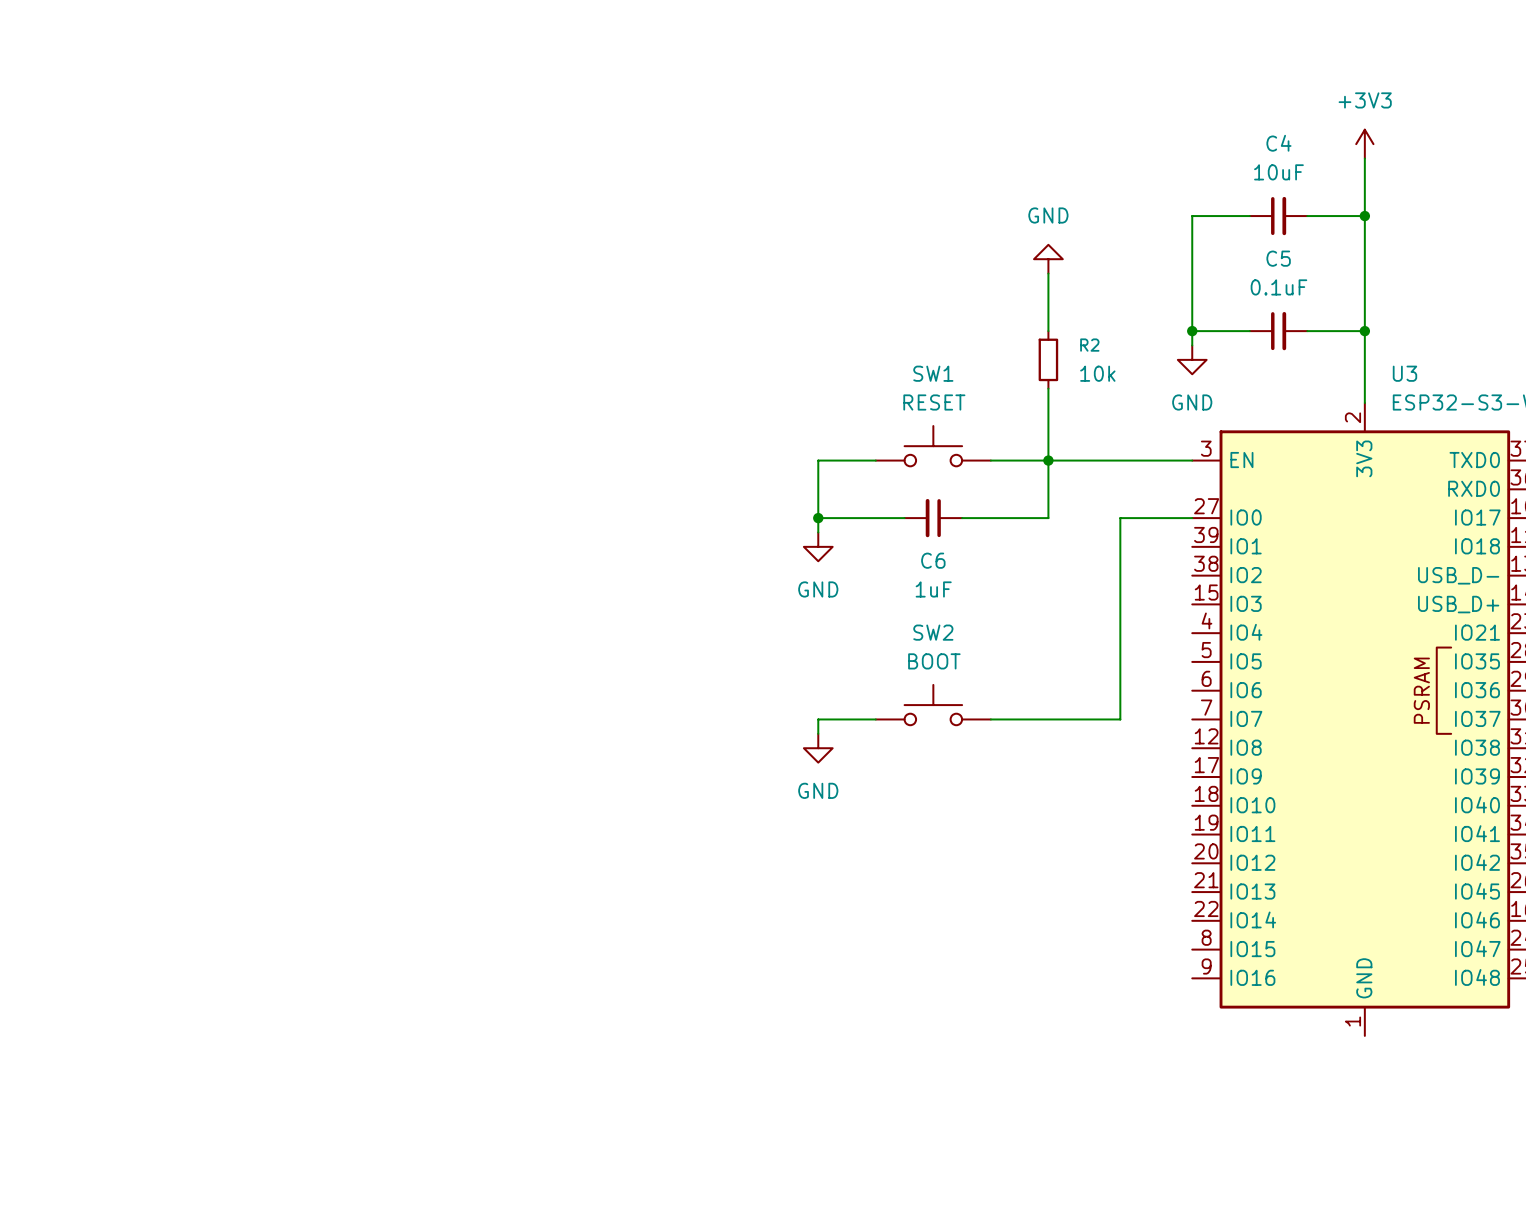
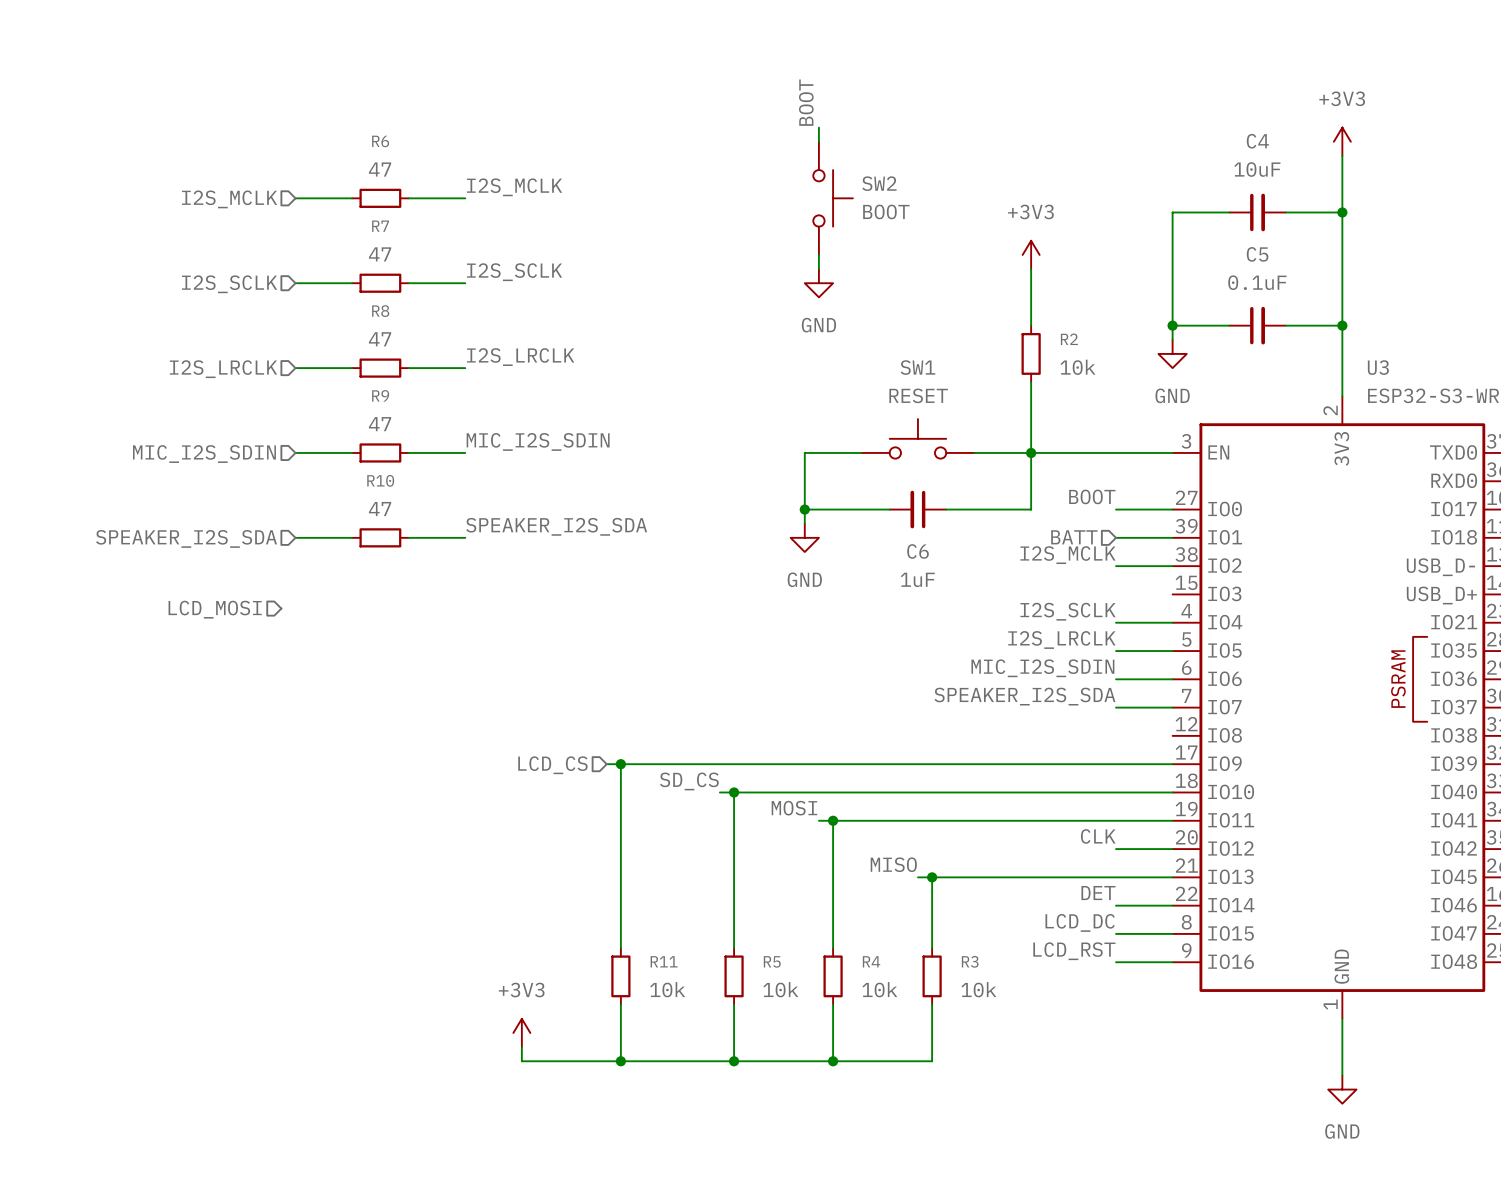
label: none -> BOOT (806, 102)
wire: none -> (818, 127) (818, 141)
label: none -> I2S_MCLK (514, 187)
hierarchical label: none -> I2S_MCLK (229, 199)
wire: none -> (295, 198) (352, 198)
R6: none -> 47 (380, 198)
wire: none -> (408, 198) (465, 198)
wire: none -> (818, 254) (818, 269)
power symbol: GND (1048, 259) -> +3V3 (1031, 254)
label: none -> I2S_SCLK (514, 272)
wire: none -> (295, 283) (352, 283)
R7: none -> 47 (380, 283)
wire: none -> (408, 283) (465, 283)
power symbol: none -> GND (818, 283)
hierarchical label: none -> I2S_SCLK (229, 284)
label: none -> I2S_LRCLK (520, 357)
hierarchical label: none -> I2S_LRCLK (223, 369)
wire: none -> (295, 368) (352, 368)
R8: none -> 47 (380, 368)
wire: none -> (408, 368) (465, 368)
label: none -> MIC_I2S_SDIN (538, 441)
hierarchical label: none -> MIC_I2S_SDIN (204, 454)
wire: none -> (295, 452) (352, 452)
R9: none -> 47 (380, 452)
wire: none -> (408, 452) (465, 452)
label: none -> BOOT (1092, 496)
wire: (1134, 518) (1120, 518) (1120, 719) (990, 719) -> none
label: none -> SPEAKER_I2S_SDA (556, 526)
wire: none -> (295, 537) (352, 537)
R10: none -> 47 (380, 537)
wire: none -> (408, 537) (465, 537)
hierarchical label: none -> BATT (1074, 537)
wire: none -> (1116, 537) (1172, 537)
hierarchical label: none -> SPEAKER_I2S_SDA (186, 538)
label: none -> I2S_MCLK (1068, 555)
wire: none -> (1116, 566) (1172, 566)
hierarchical label: none -> LCD_MOSI (215, 609)
label: none -> I2S_SCLK (1068, 611)
wire: none -> (1116, 622) (1172, 622)
label: none -> I2S_LRCLK (1061, 639)
SW2 value position: BOOT (934, 661) -> BOOT (886, 211)
wire: none -> (1116, 651) (1172, 651)
label: none -> MIC_I2S_SDIN (1042, 668)
wire: none -> (1116, 679) (1172, 679)
SW2 rotation: 0° (933, 705) -> 90° clockwise (833, 198)
SW2 position: (933, 705) -> (833, 198)
label: none -> SPEAKER_I2S_SDA (1024, 696)
wire: (875, 719) (818, 719) (818, 733) -> none
wire: none -> (1116, 707) (1172, 707)
power symbol: GND (818, 748) -> none
hierarchical label: none -> LCD_CS (552, 765)
wire: none -> (606, 764) (1172, 764)
wire: none -> (620, 764) (620, 948)
junction: none -> (620, 764)
label: none -> SD_CS (689, 781)
wire: none -> (719, 792) (1172, 792)
wire: none -> (734, 792) (734, 948)
junction: none -> (734, 792)
label: none -> MOSI (794, 808)
wire: none -> (818, 820) (1172, 820)
wire: none -> (833, 820) (833, 948)
junction: none -> (833, 820)
label: none -> CLK (1098, 836)
wire: none -> (1116, 849) (1172, 849)
label: none -> MISO (893, 864)
wire: none -> (917, 877) (1172, 877)
wire: none -> (932, 877) (932, 948)
junction: none -> (932, 877)
label: none -> DET (1098, 893)
wire: none -> (1116, 905) (1172, 905)
label: none -> LCD_DC (1080, 922)
wire: none -> (1116, 933) (1172, 933)
label: none -> LCD_RST (1074, 951)
wire: none -> (1116, 962) (1172, 962)
R11: none -> 10k (620, 976)
R5: none -> 10k (734, 976)
R4: none -> 10k (833, 976)
R3: none -> 10k (932, 976)
wire: none -> (620, 1004) (620, 1061)
wire: none -> (734, 1004) (734, 1061)
wire: none -> (833, 1004) (833, 1061)
wire: none -> (932, 1004) (932, 1061) (521, 1061) (521, 1047)
wire: none -> (1342, 1018) (1342, 1075)
power symbol: none -> +3V3 (521, 1032)
junction: none -> (620, 1061)
junction: none -> (734, 1061)
junction: none -> (833, 1061)
power symbol: none -> GND (1342, 1089)

